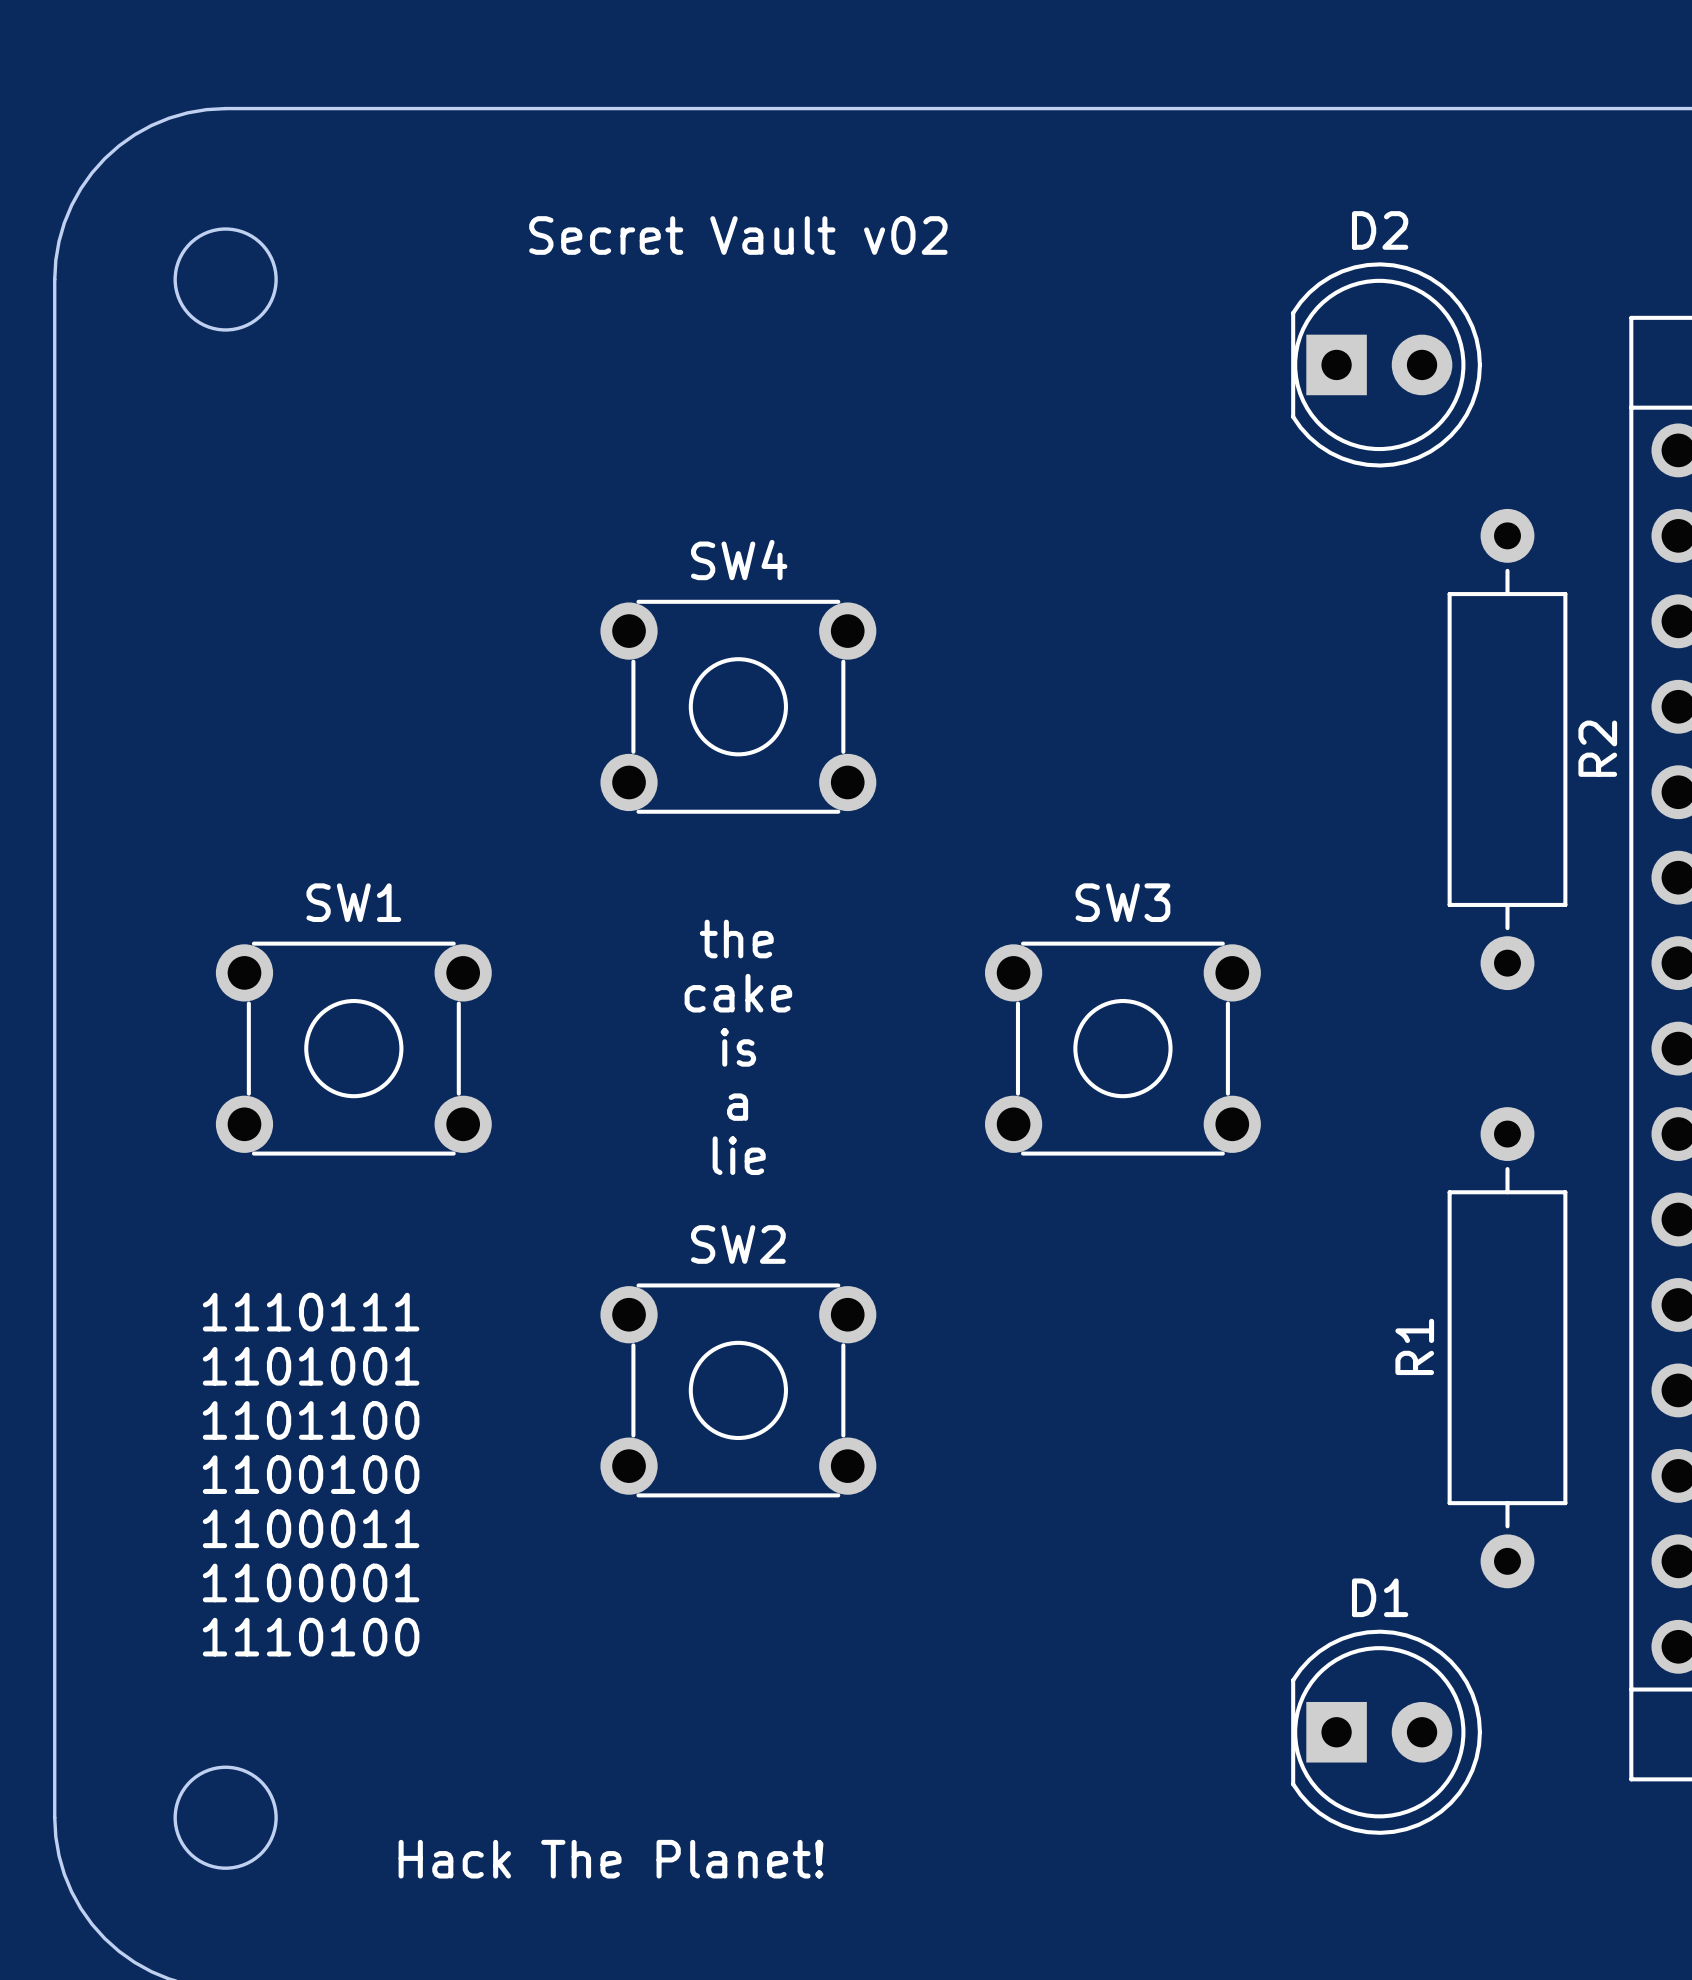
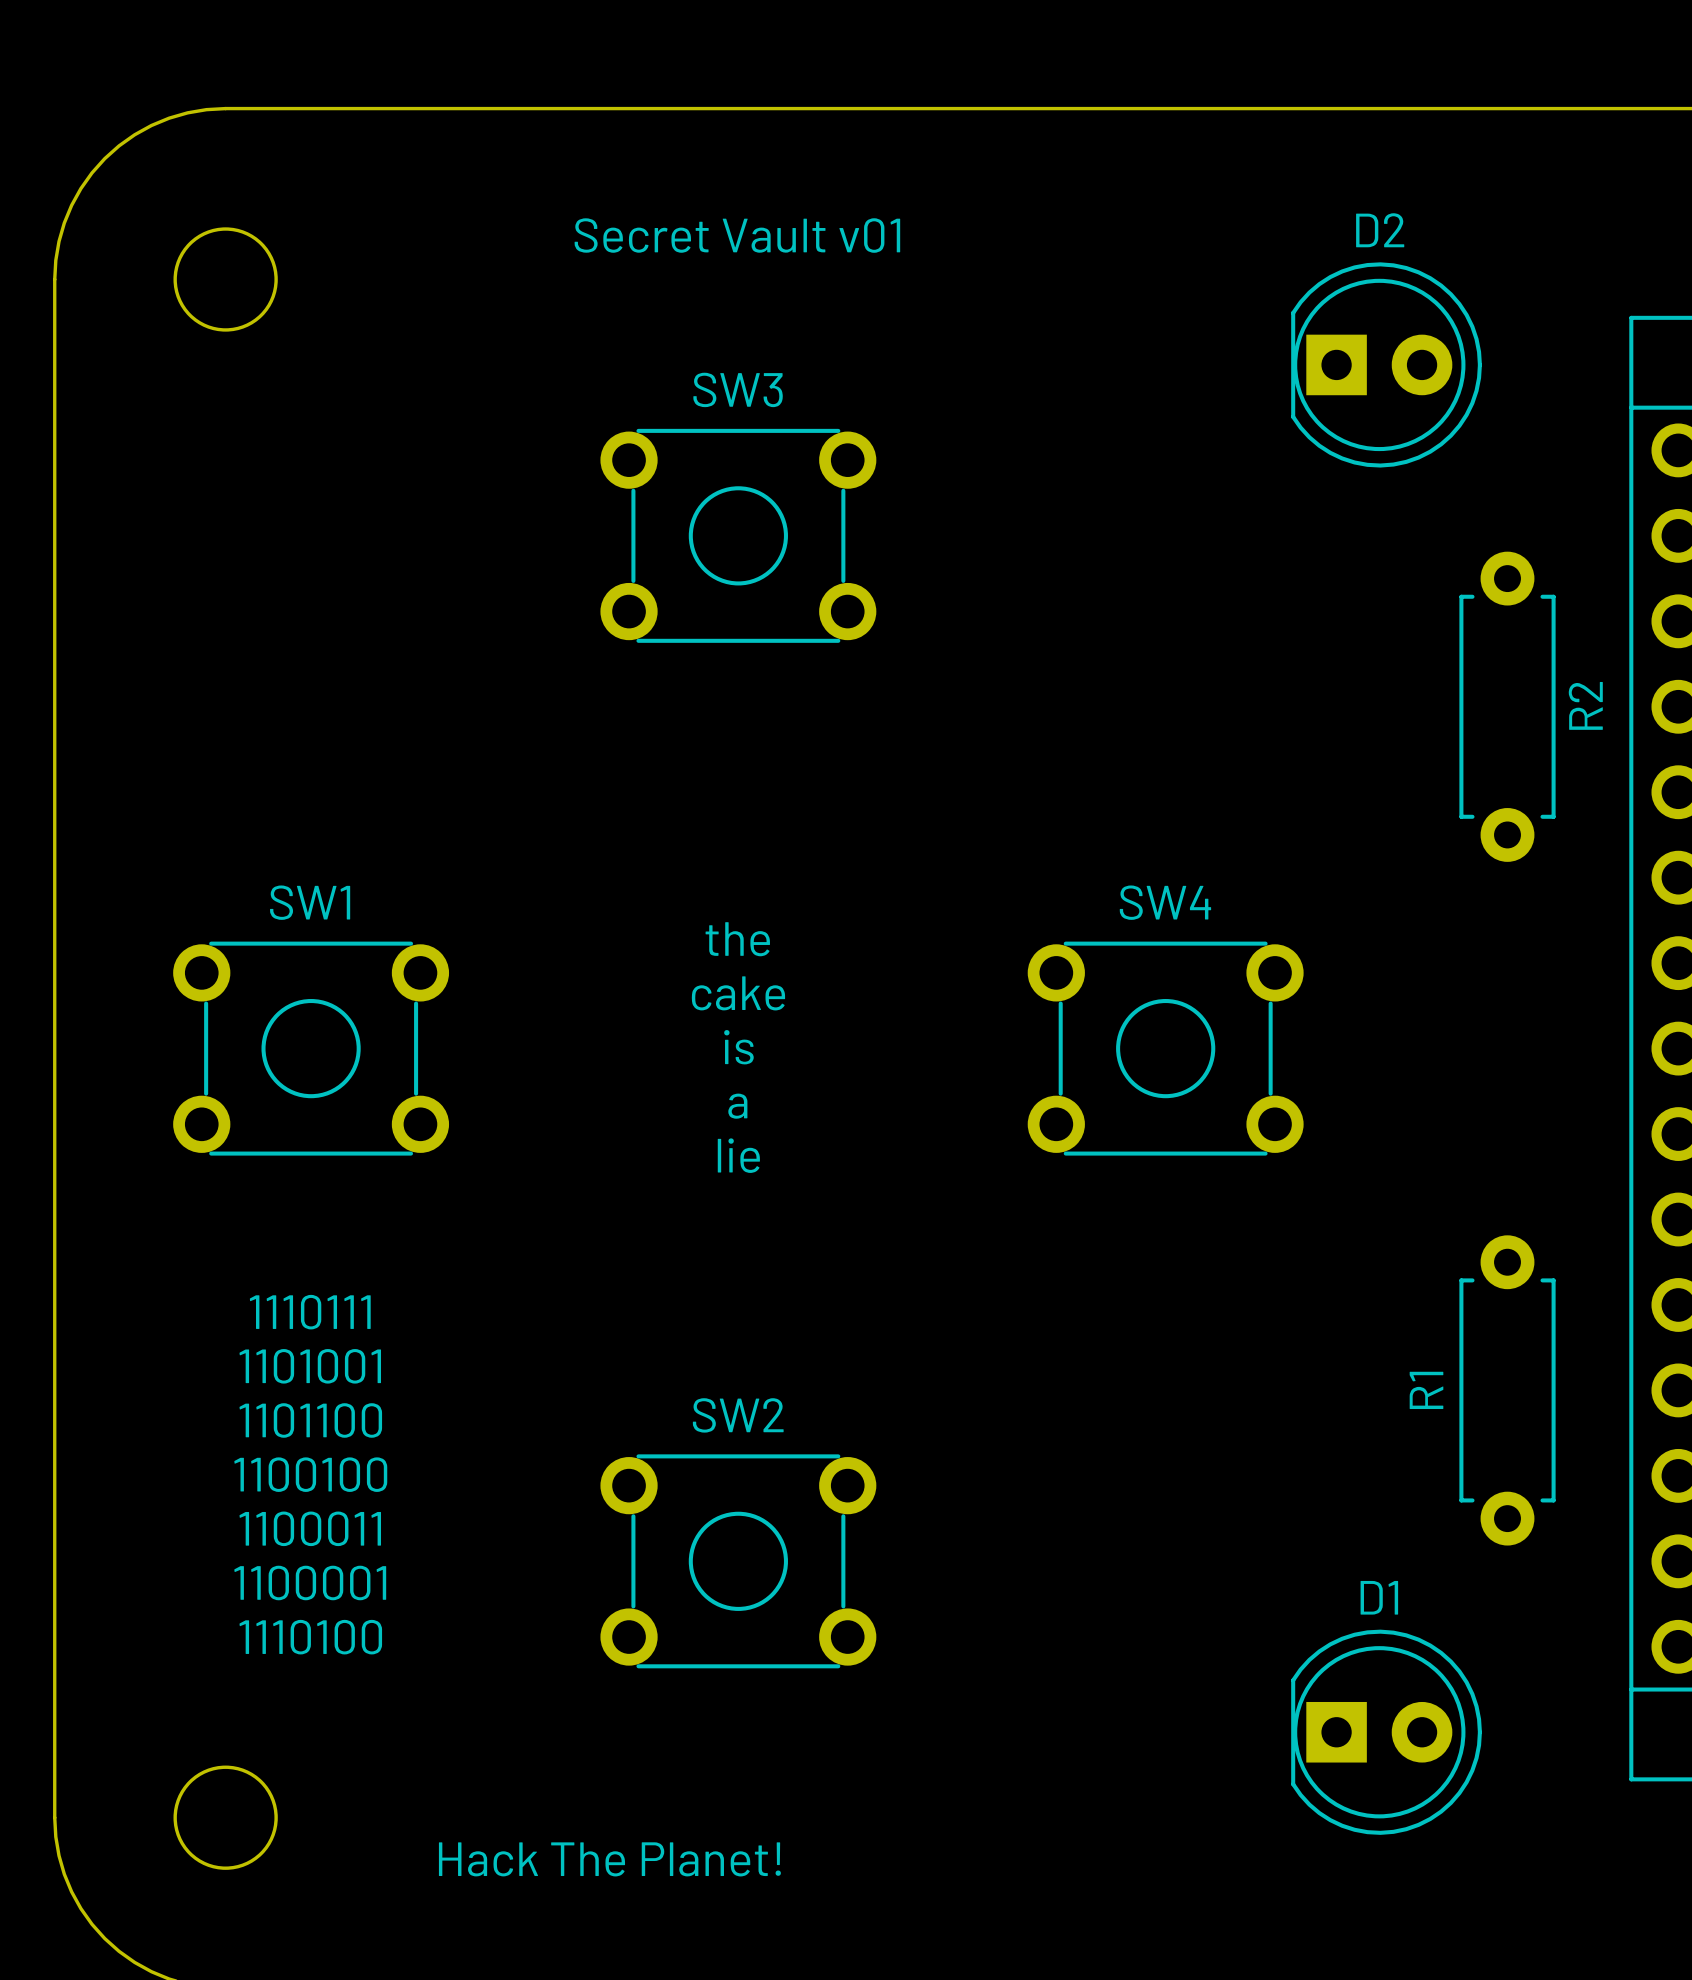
text: Secret Vault v02 (738, 235) -> Secret Vault v01 (737, 235)
R2 footprint: [1447, 508, 1568, 991] -> [1459, 551, 1556, 862]
SW4 position: (738, 706) -> (1165, 1048)
SW1 position: (353, 1048) -> (311, 1048)
SW3 position: (1122, 1048) -> (738, 535)
R1 footprint: [1447, 1107, 1568, 1589] -> [1459, 1235, 1556, 1546]
SW2 position: (738, 1390) -> (738, 1561)

